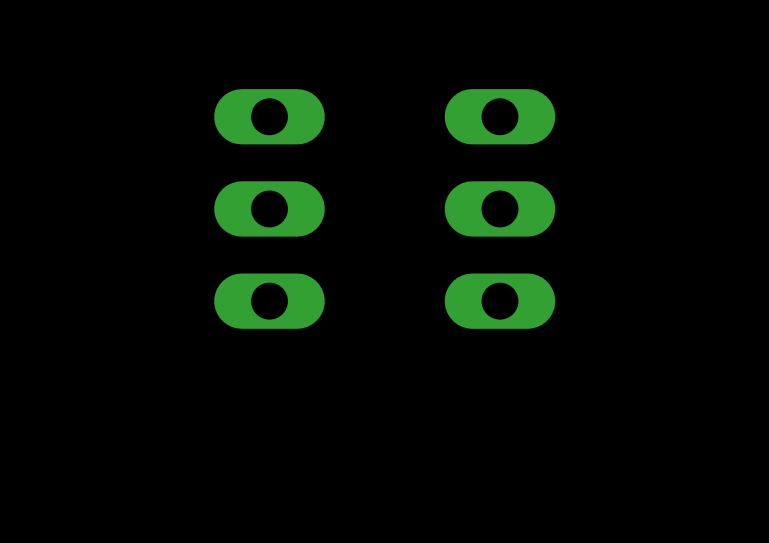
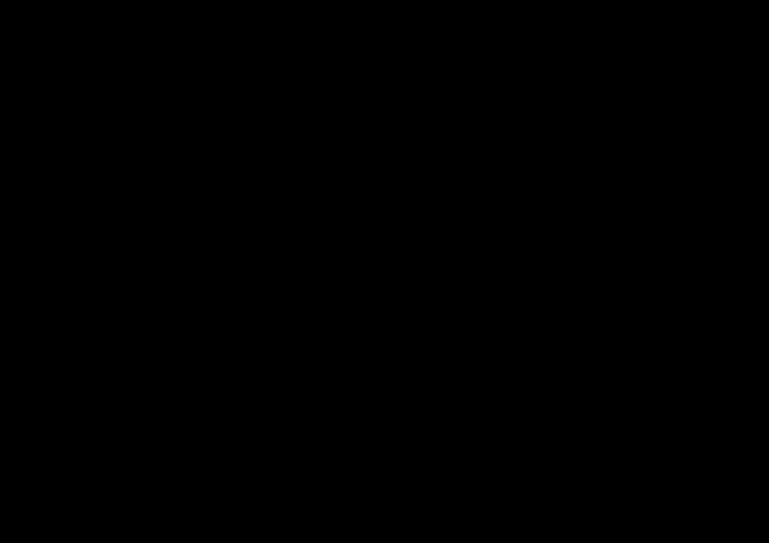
part: (269, 208) -> none
part: (499, 208) -> none

